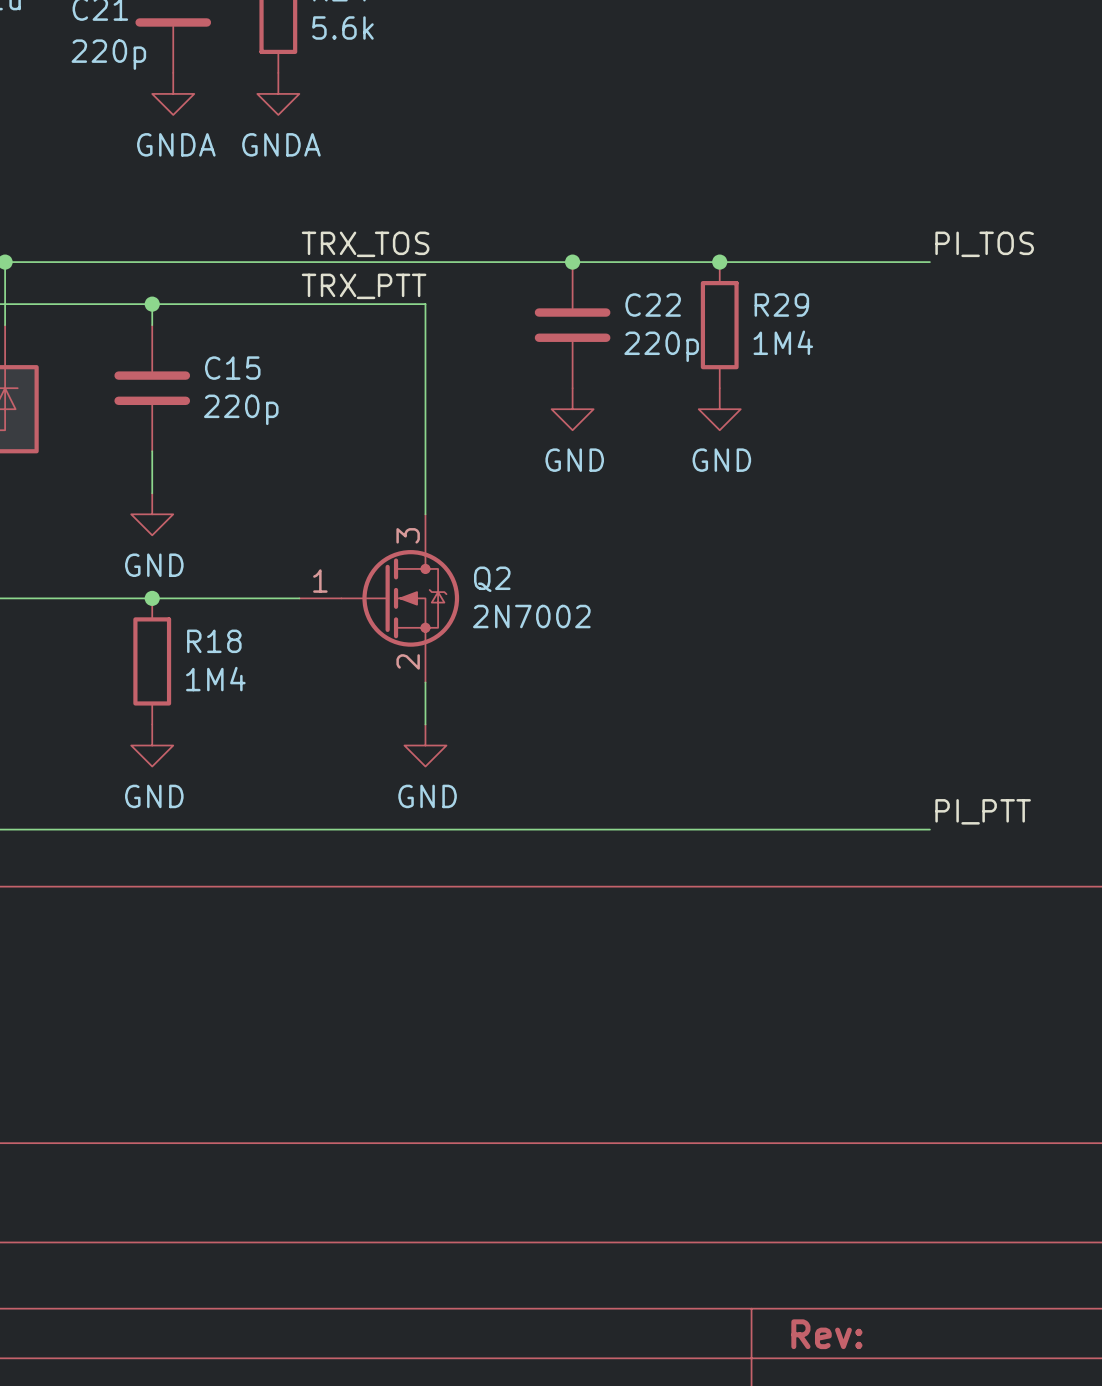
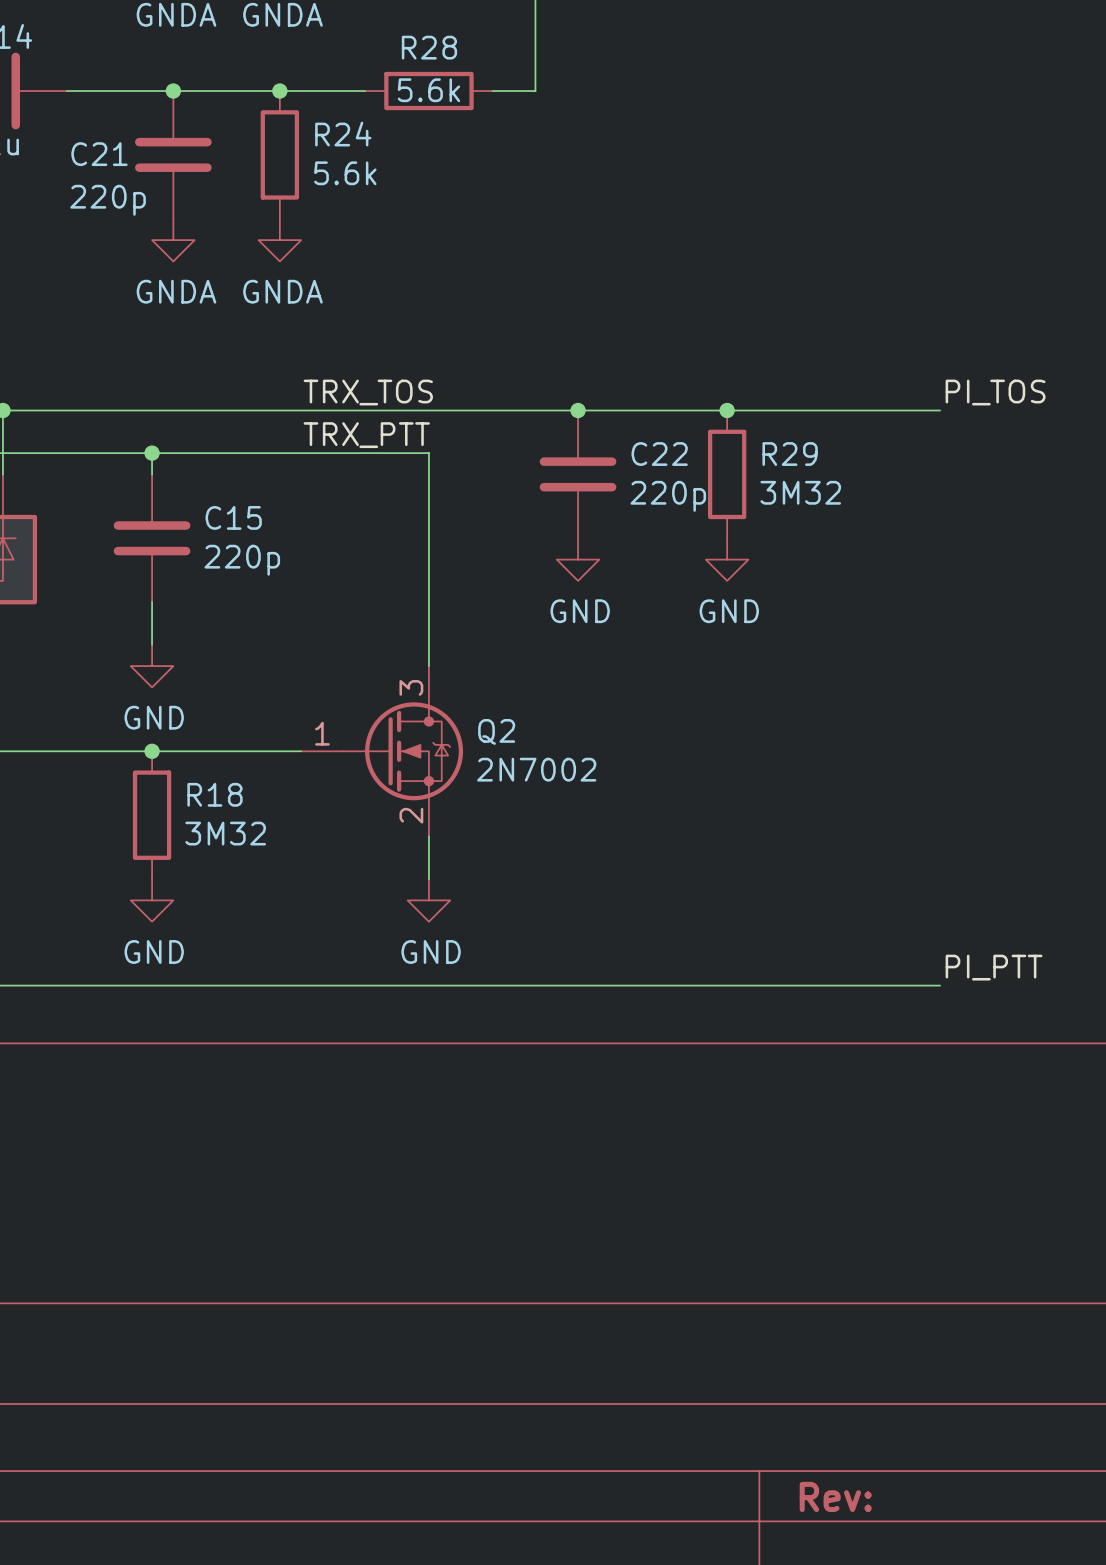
R29 value: 1M4 (783, 342) -> 3M32 (800, 492)
R18 value: 1M4 (215, 679) -> 3M32 (225, 833)

